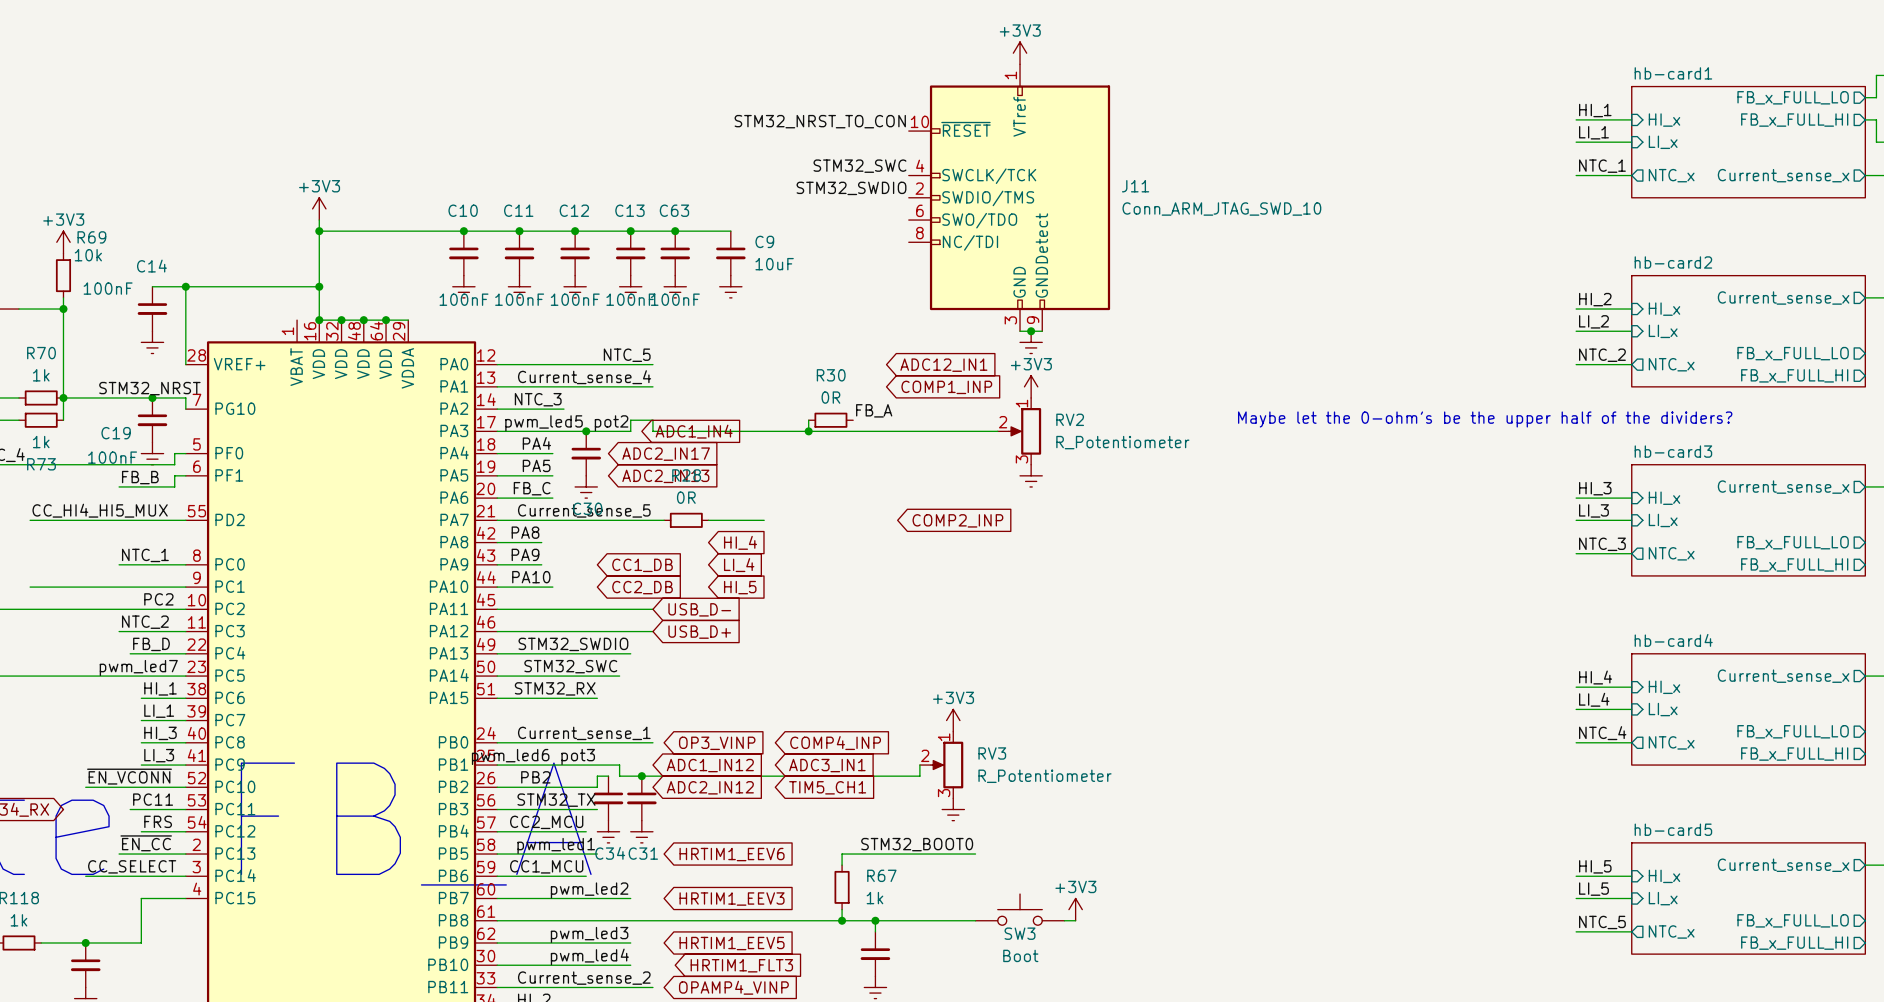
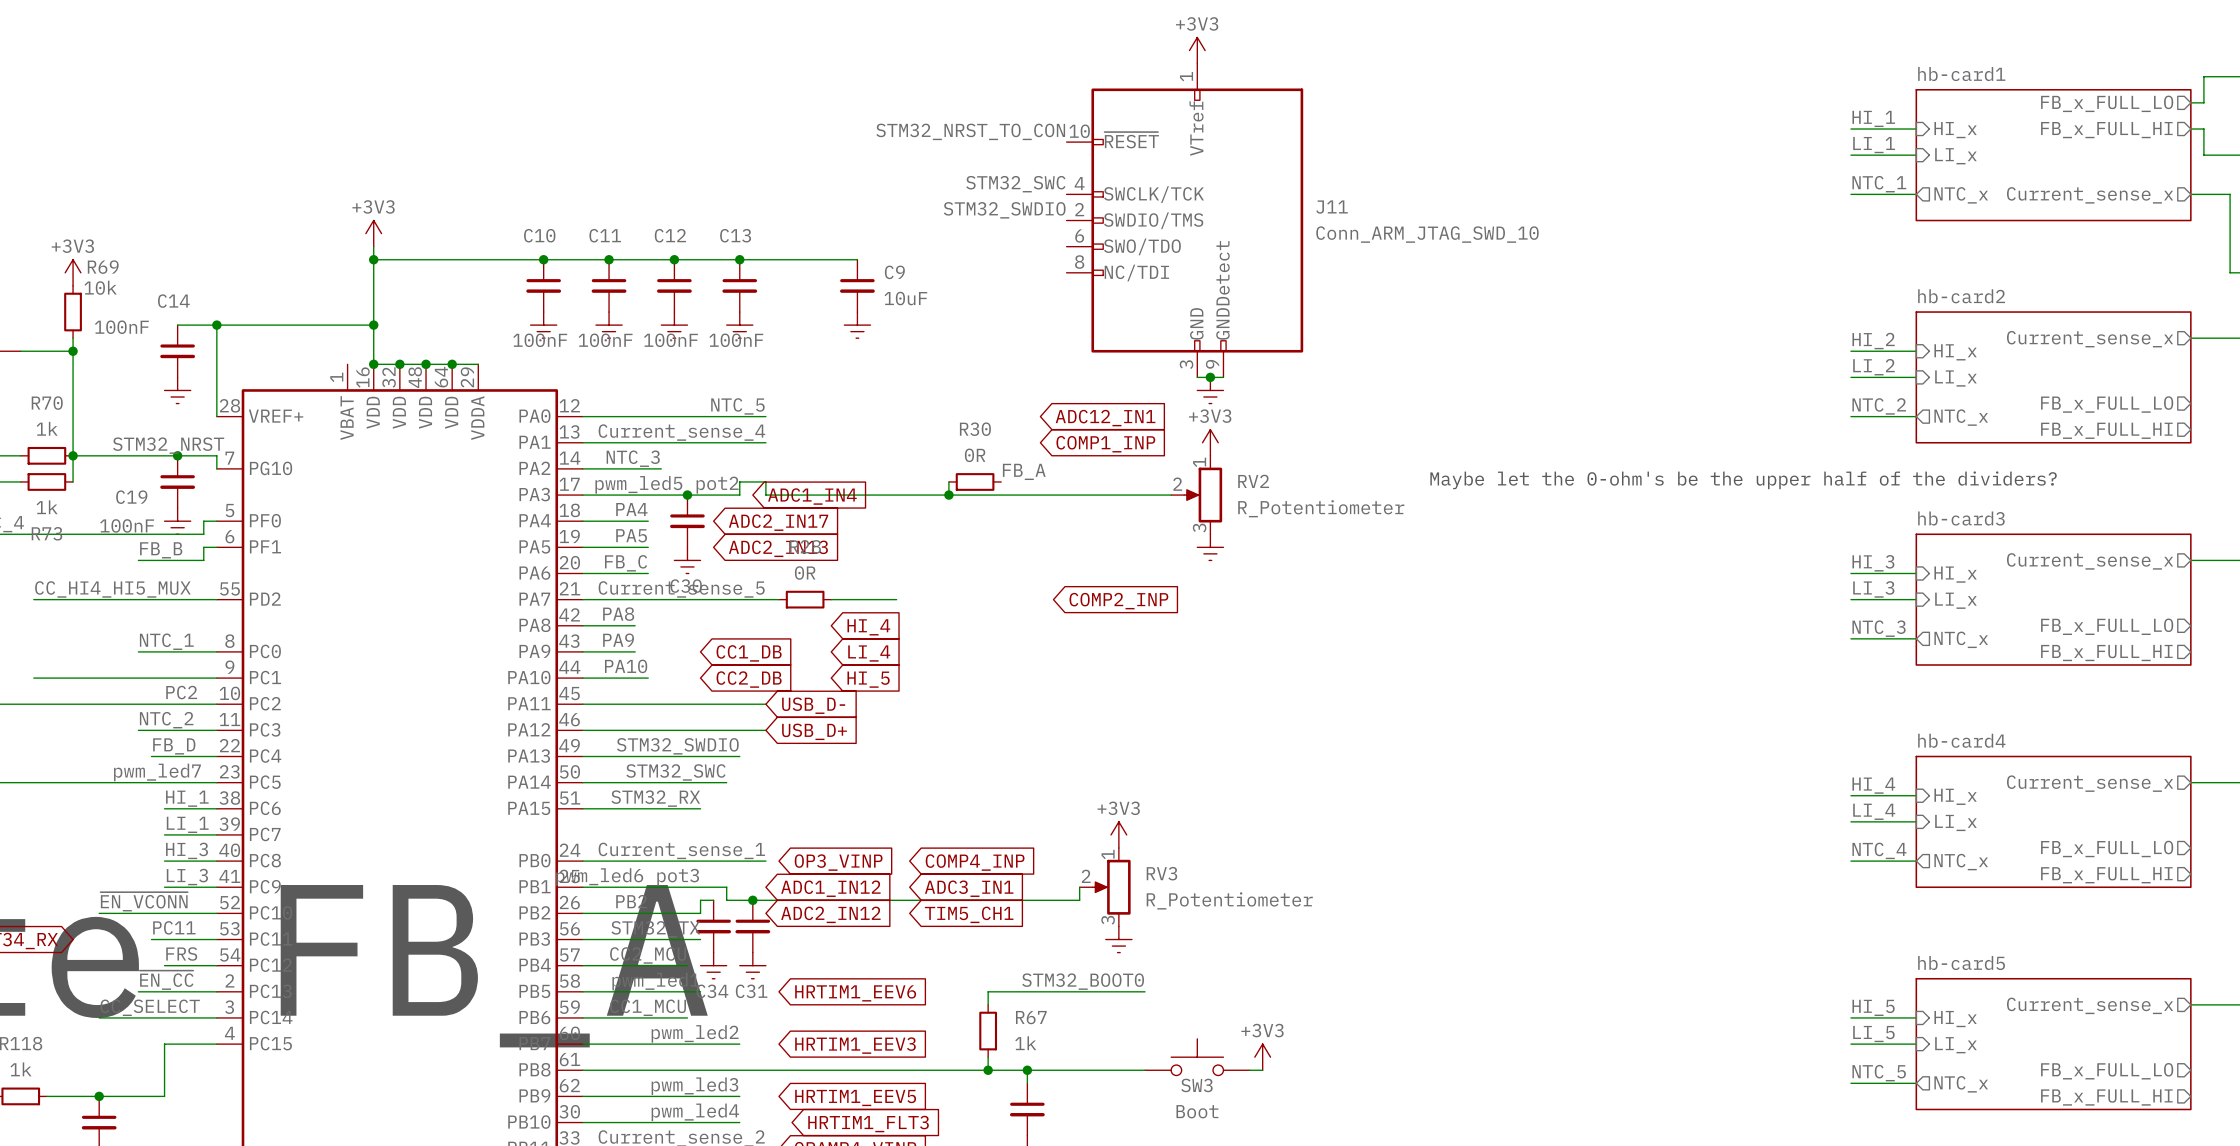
junction: (675, 231) -> none
C63: 100nF (675, 253) -> none
power symbol: (675, 286) -> none

